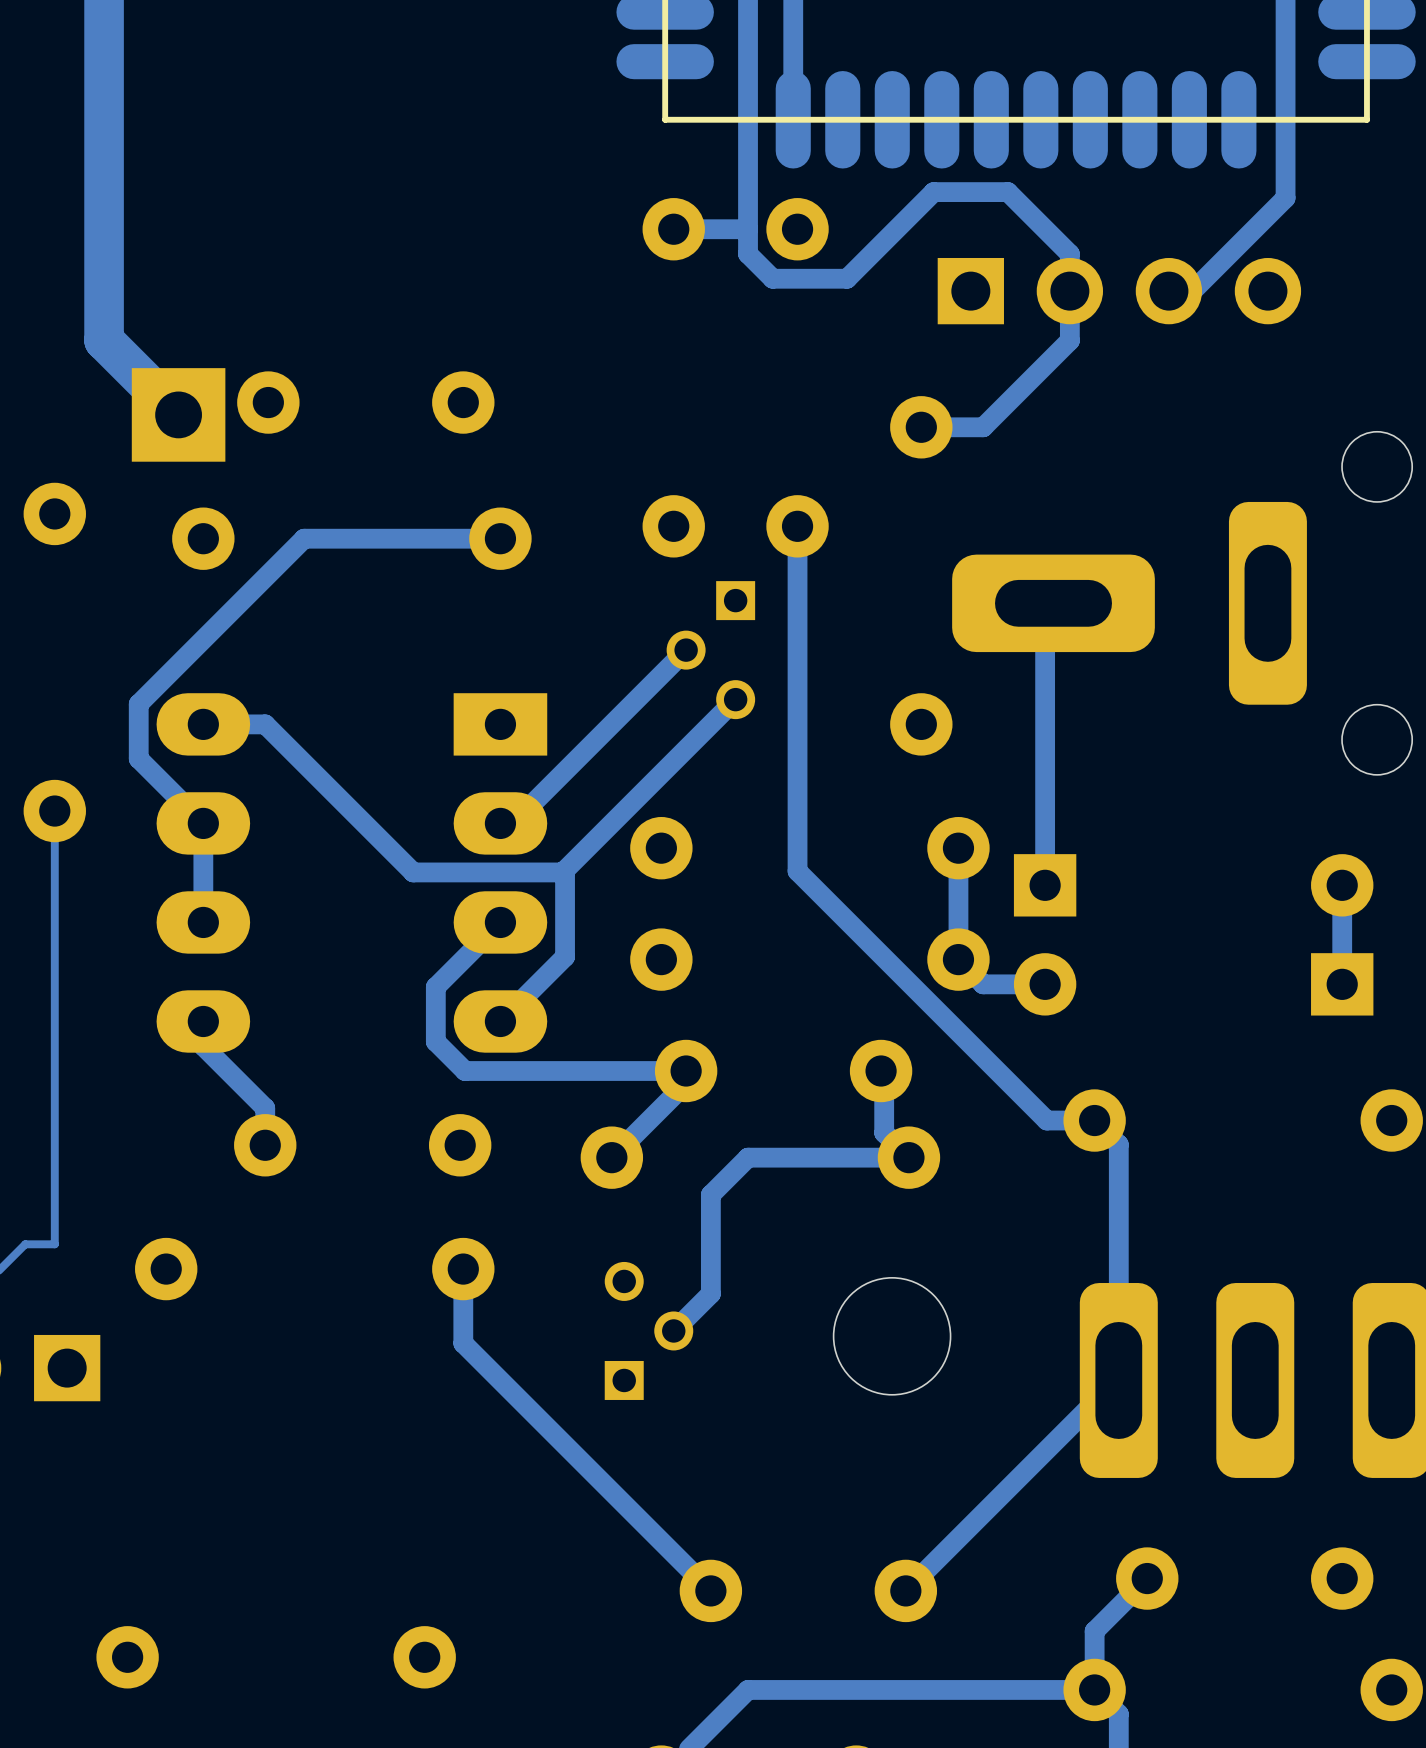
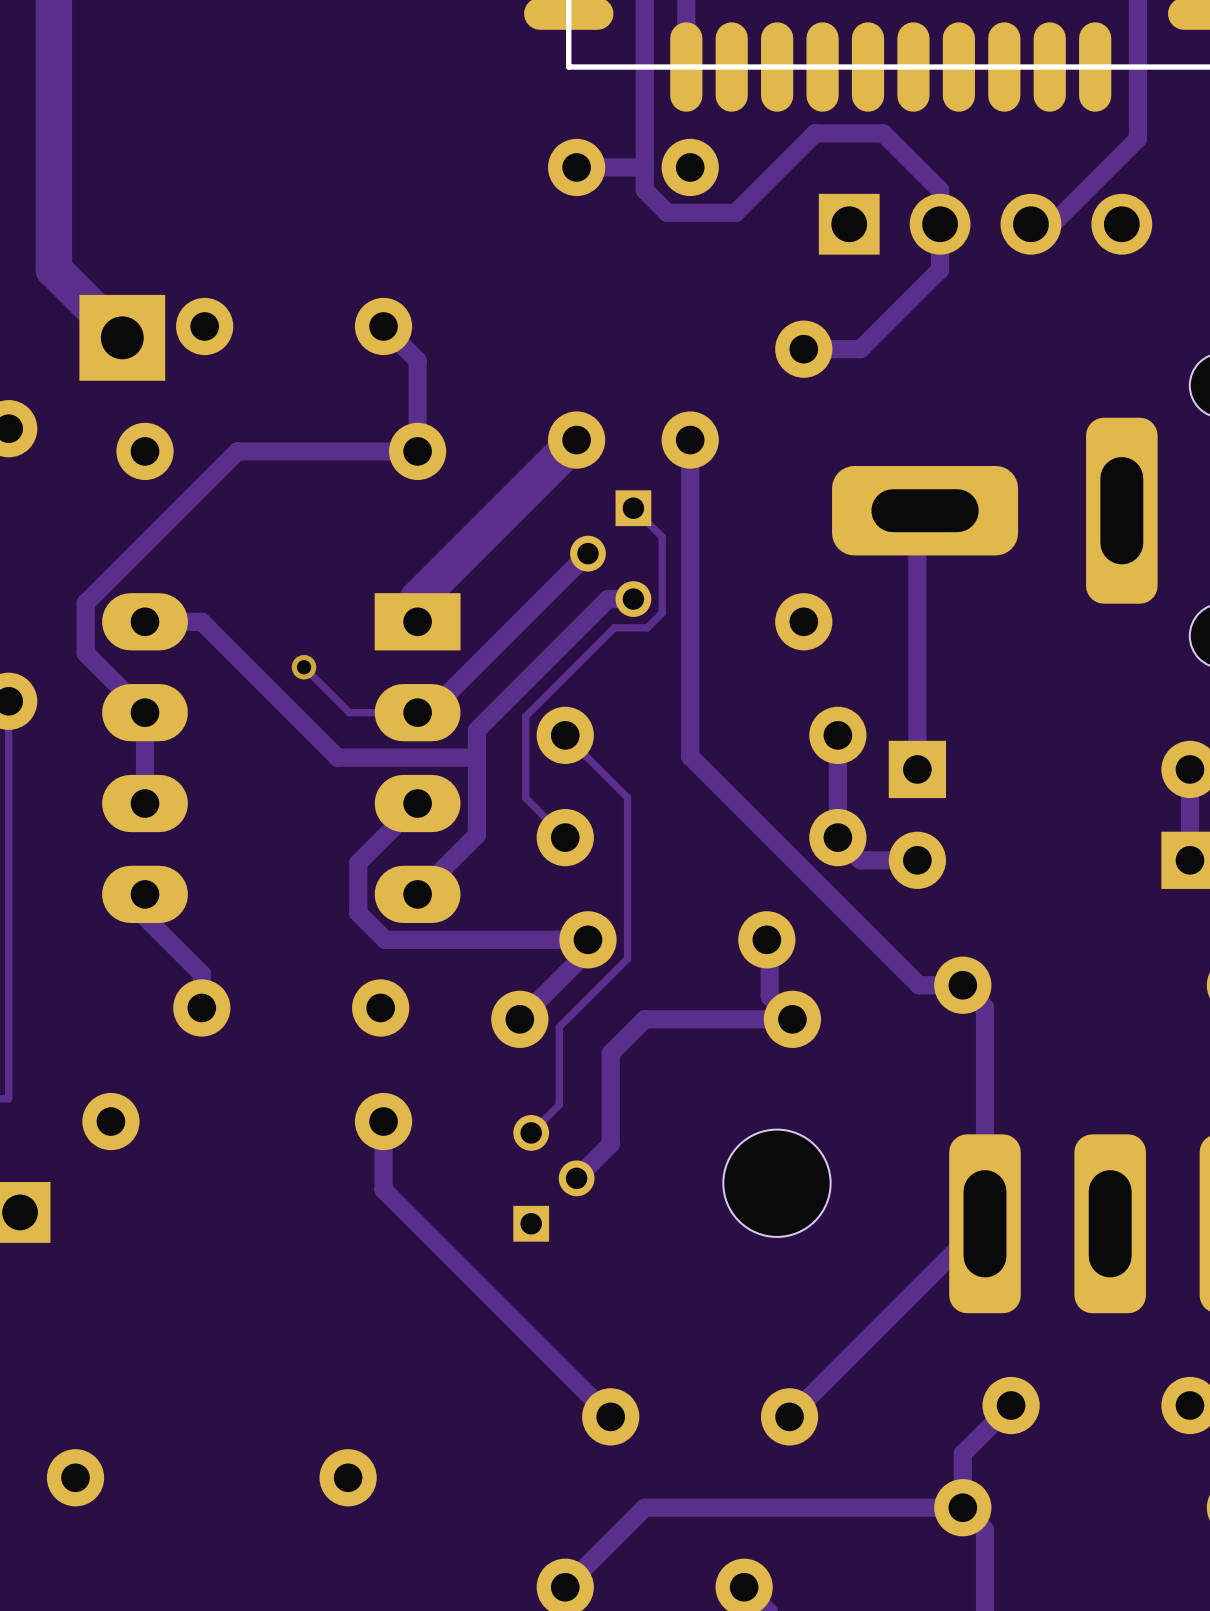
track: none -> (383, 326) (417, 360) (417, 451)
track: none -> (576, 440) (417, 599) (417, 621)
track: none -> (633, 508) (662, 536) (662, 612) (647, 627) (614, 627) (525, 716) (525, 798) (565, 837)
track: (735, 699) (565, 870) -> (633, 599) (608, 599) (476, 730) (476, 755)
track: none -> (304, 667) (349, 712) (417, 712)
via: none -> (304, 667)
track: none -> (565, 735) (627, 797) (627, 958) (559, 1026) (559, 1104) (531, 1132)

